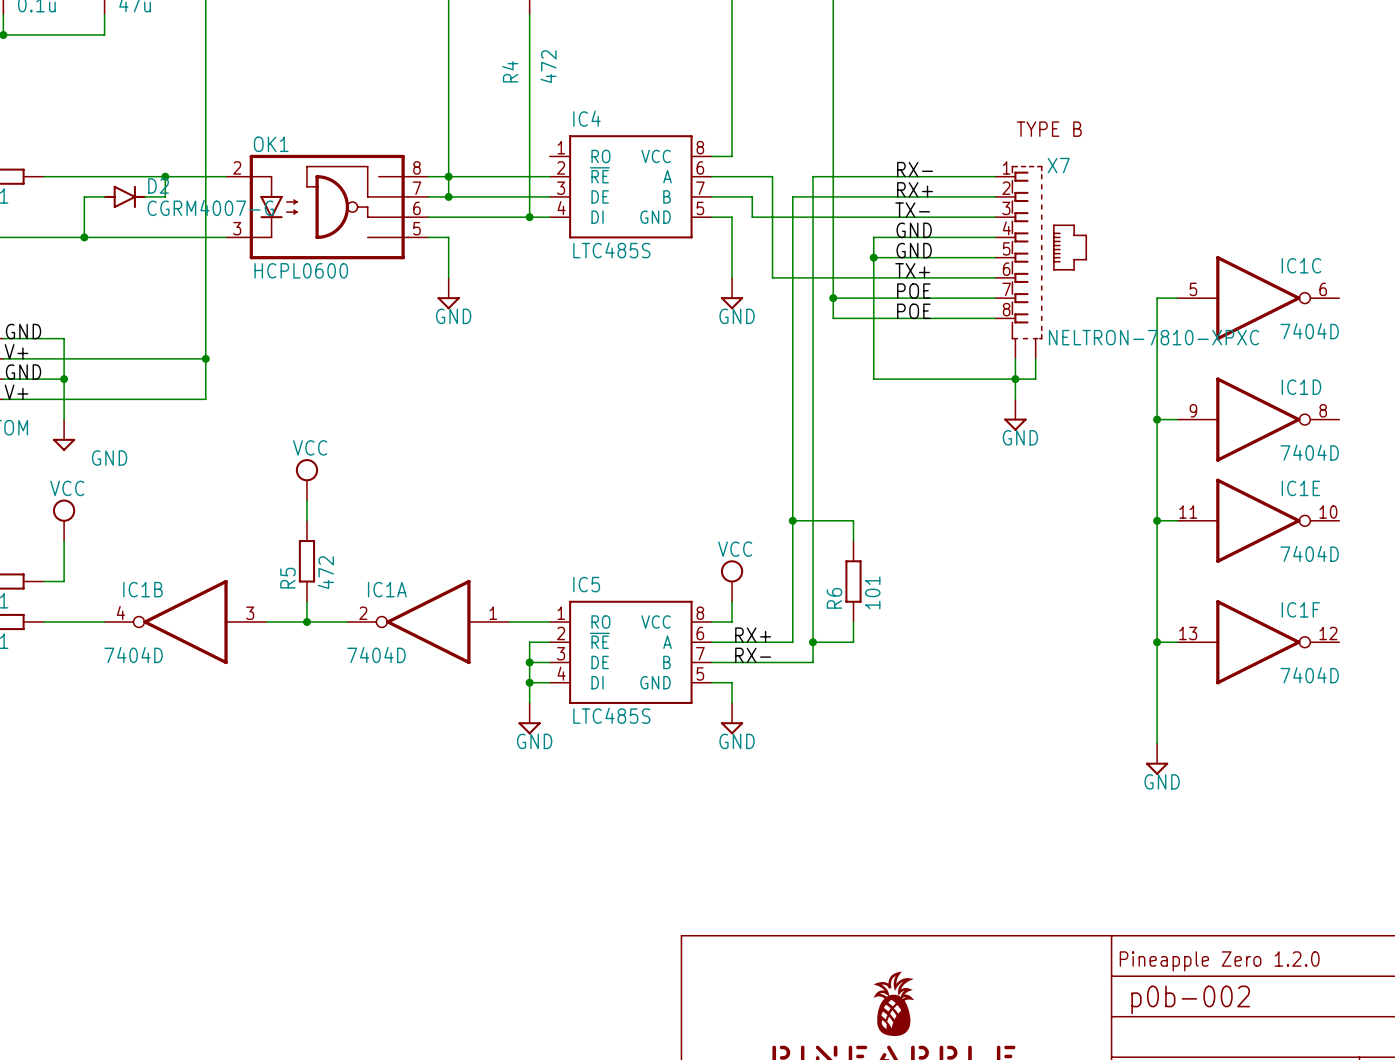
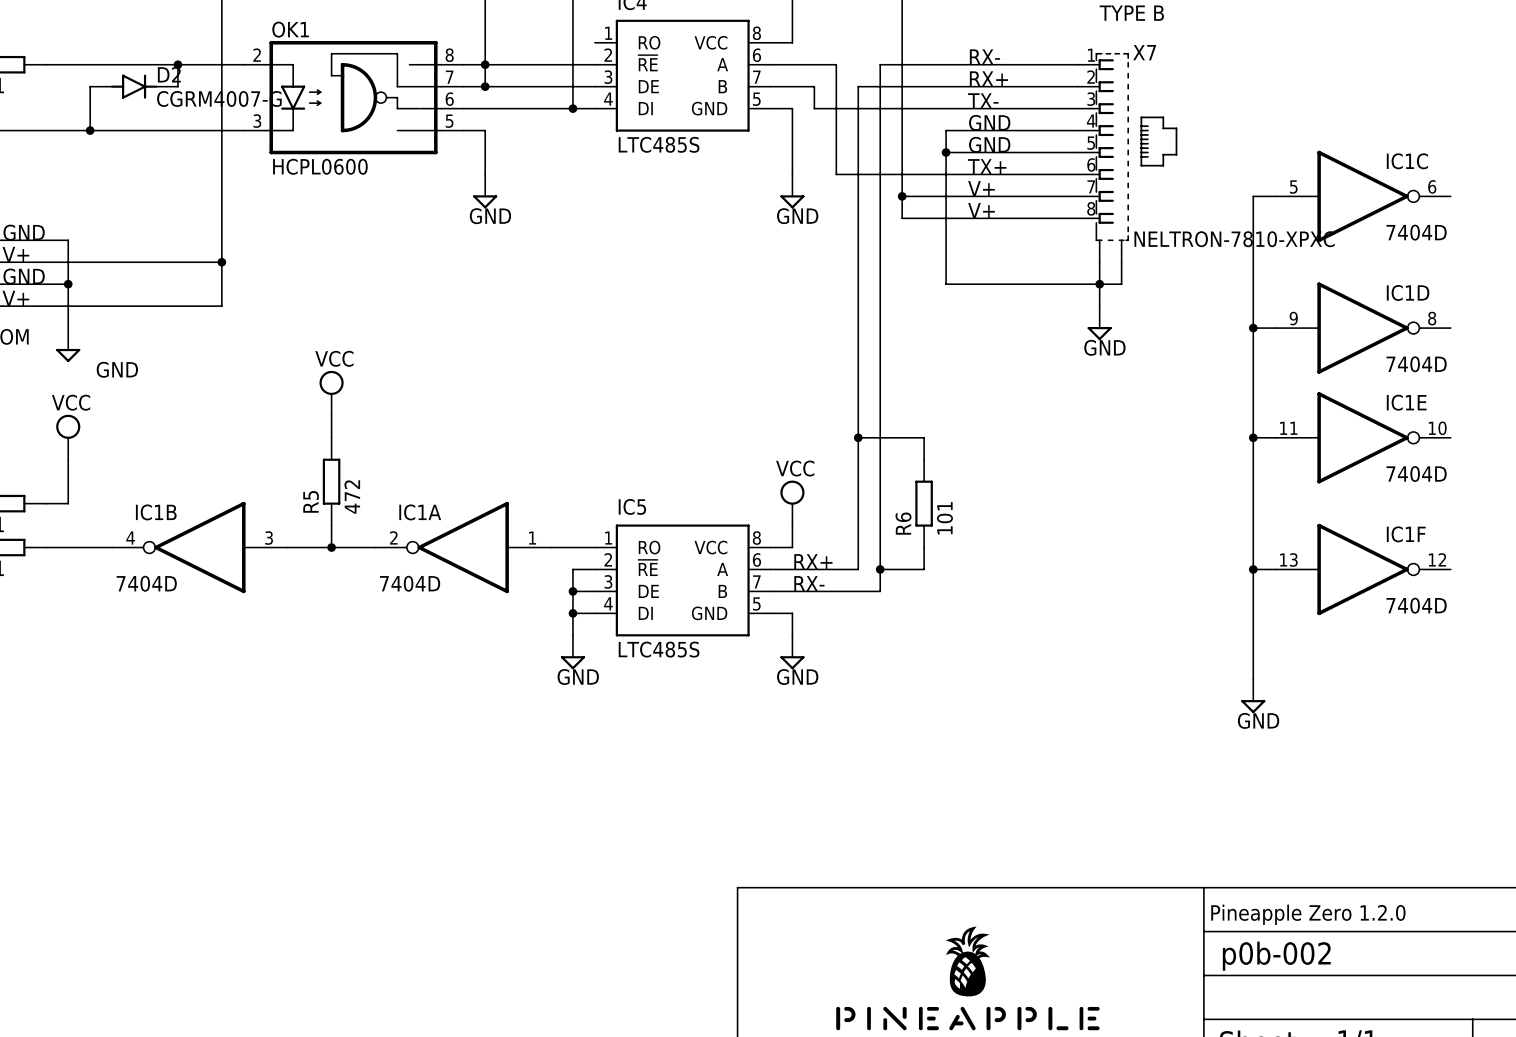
label: POE (913, 291) -> V+ (981, 188)
label: POE (913, 311) -> V+ (981, 210)

